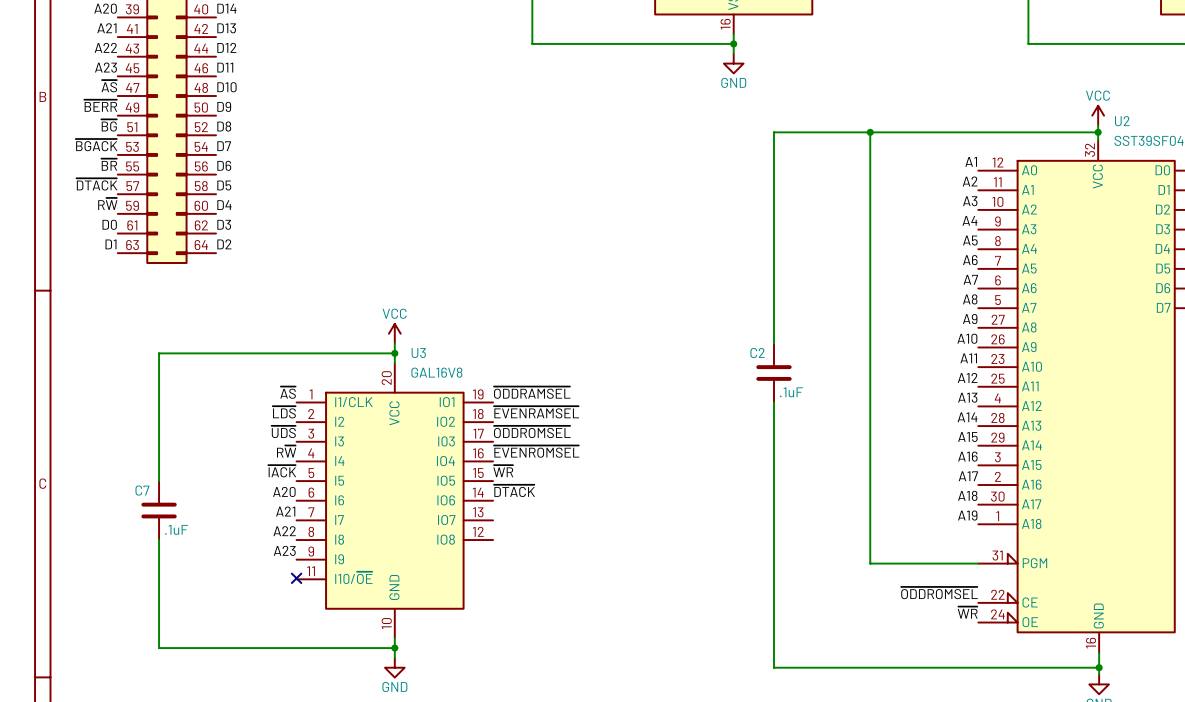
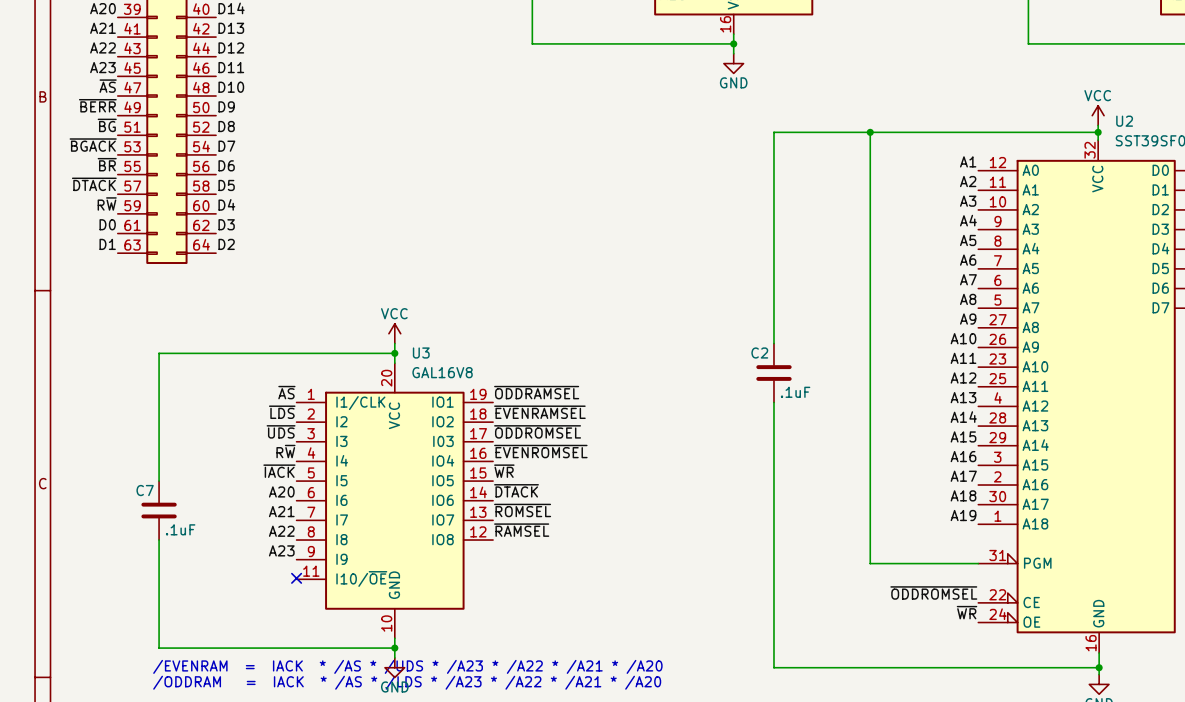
label: none -> ~{ROMSEL} (522, 510)
label: none -> ~{RAMSEL} (521, 530)
text: none -> /EVENRAM = IACK * /AS * /UDS * /A23 * /A22 * /A21 * /A20 (407, 666)
text: none -> /ODDRAM = IACK * /AS * /LDS * /A23 * /A22 * /A21 * /A20 (407, 682)

